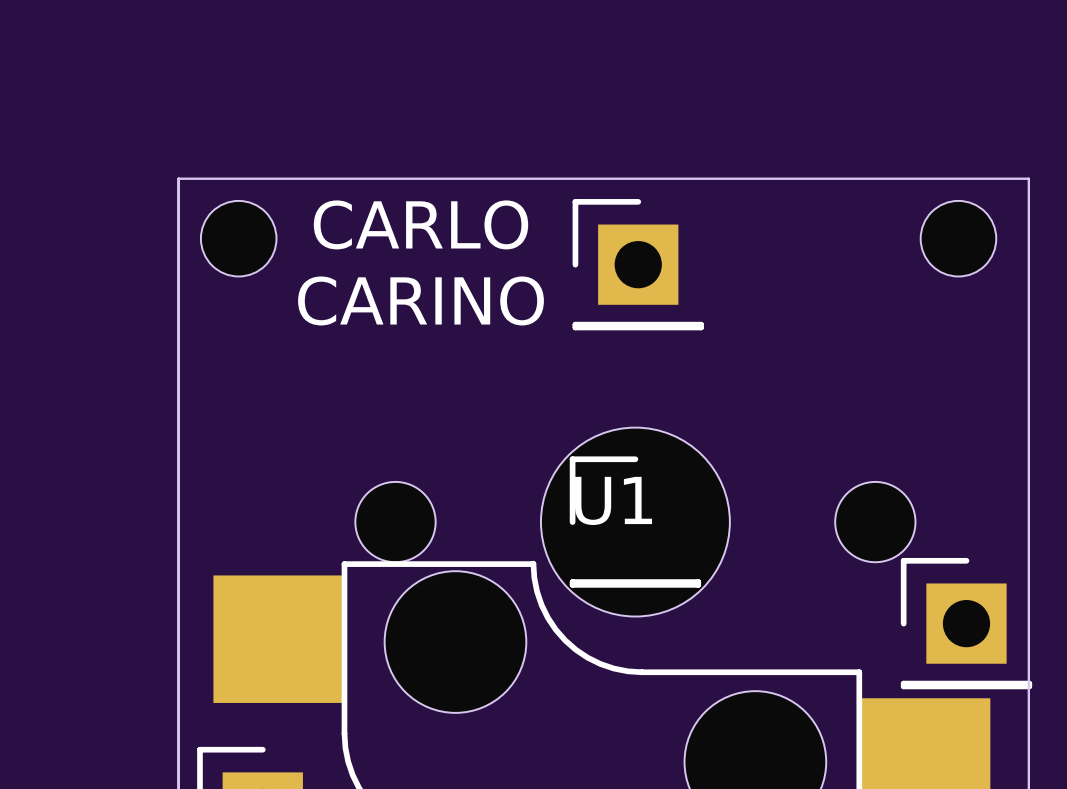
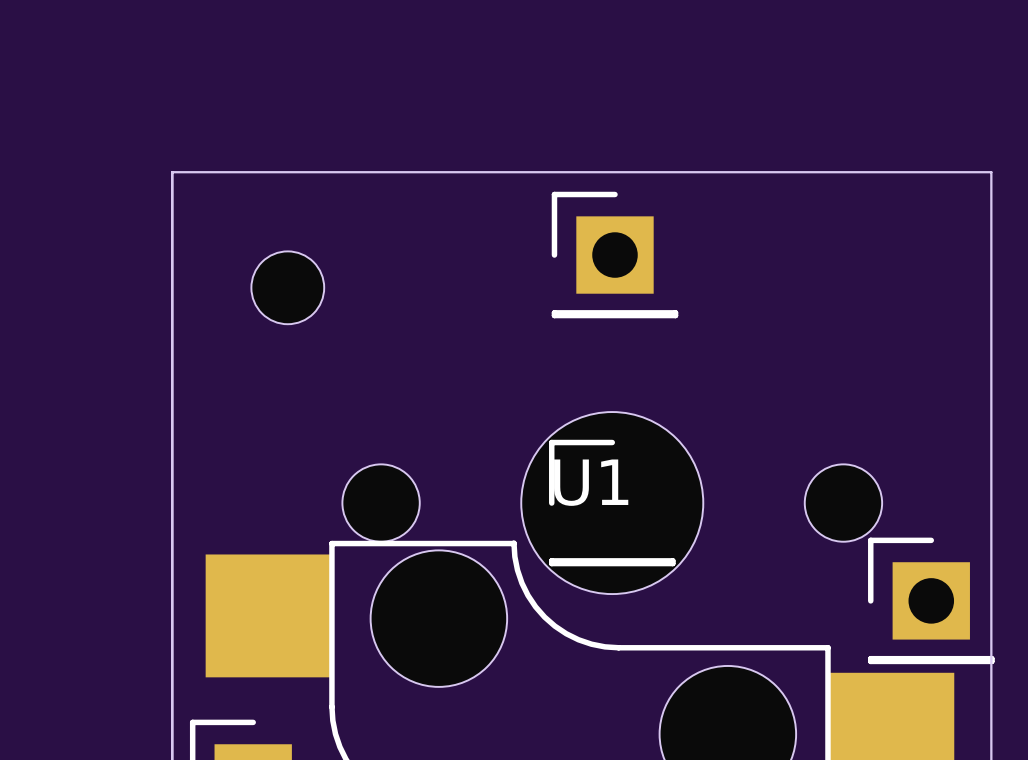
text: CARLO (421, 224) -> none
part position: (238, 238) -> (287, 287)
part: (958, 238) -> none
text: CARINO (421, 300) -> none

